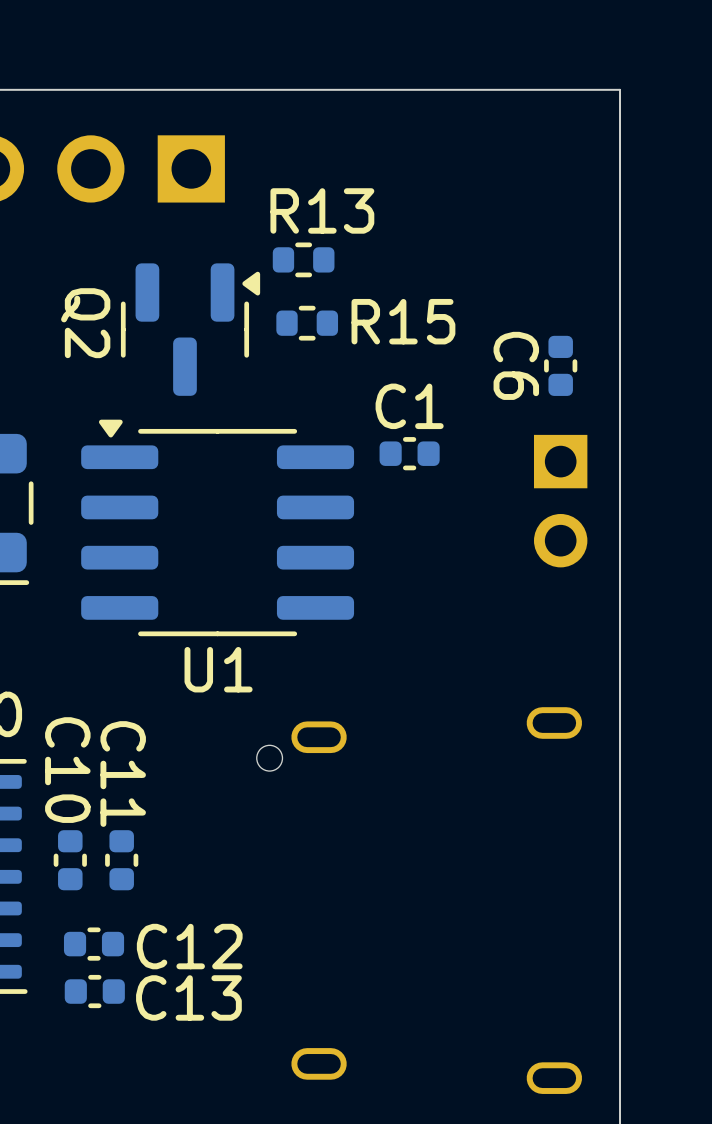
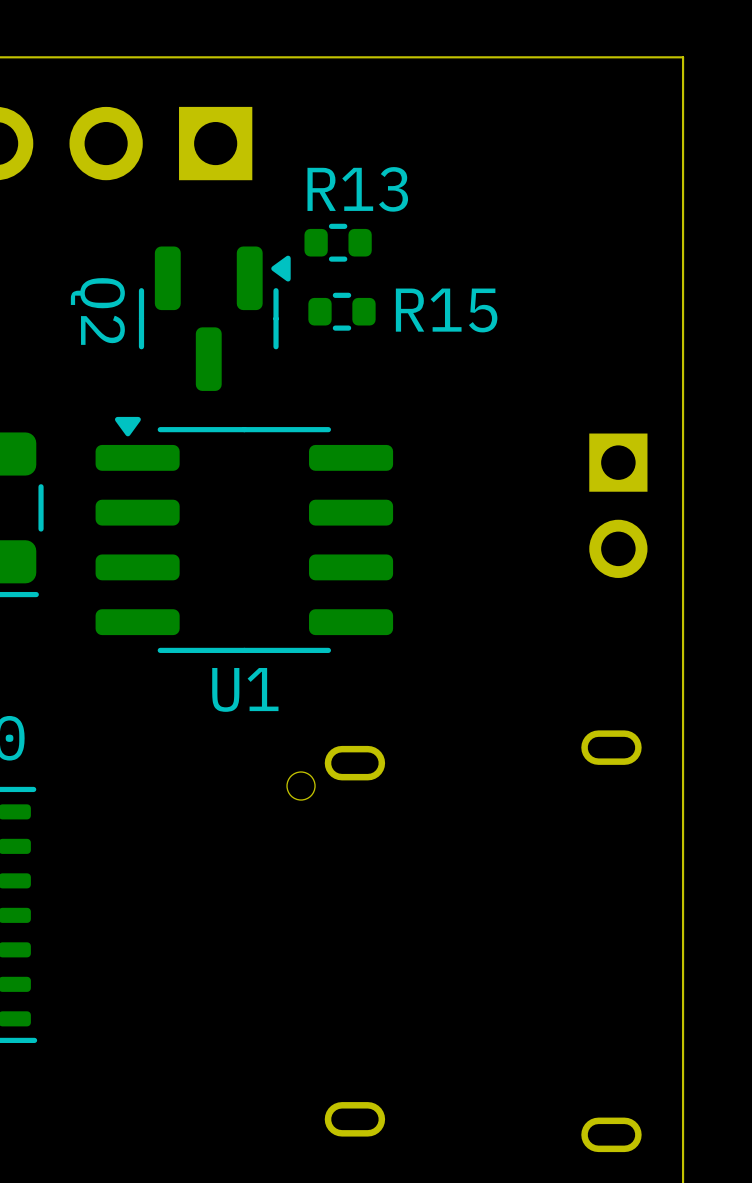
C6: (560, 365) -> none
C1: (409, 453) -> none
C10: (70, 860) -> none
C11: (121, 860) -> none
C12: (94, 944) -> none
C13: (94, 991) -> none

